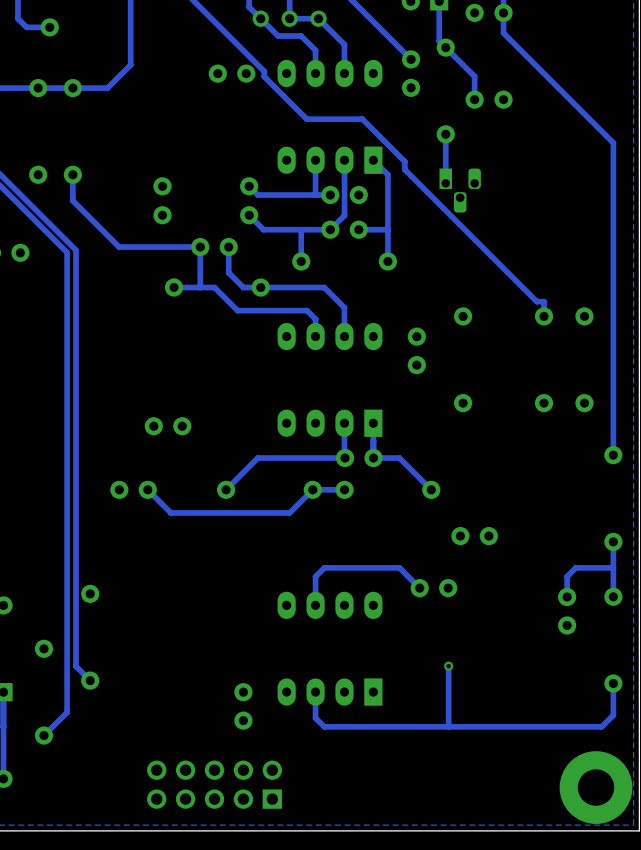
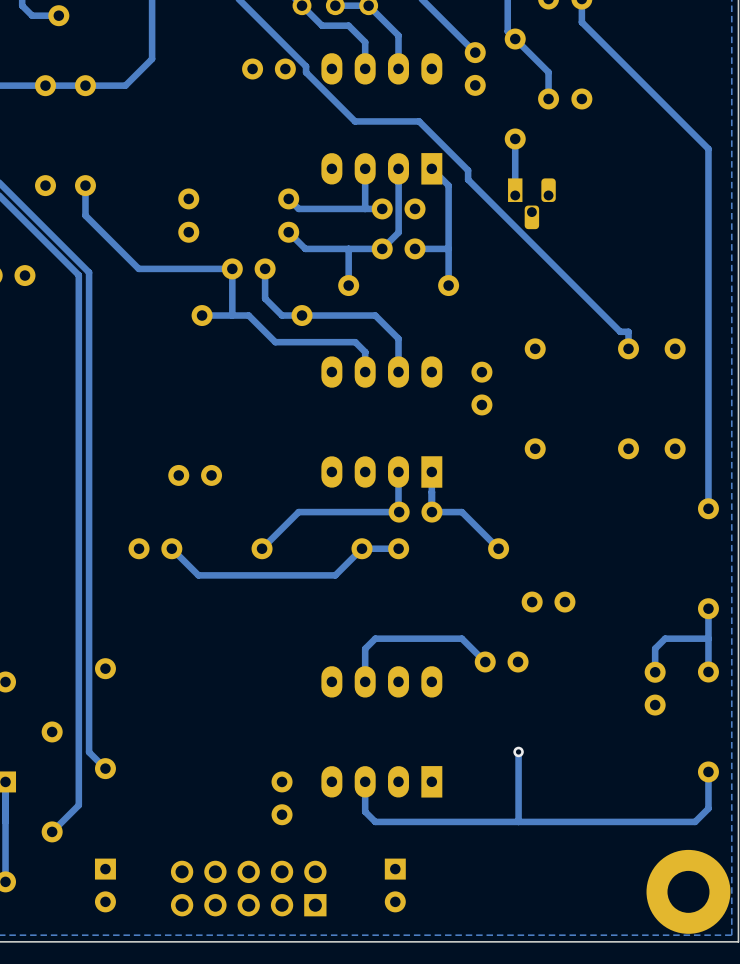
part: none -> (105, 885)
part: none -> (395, 885)

